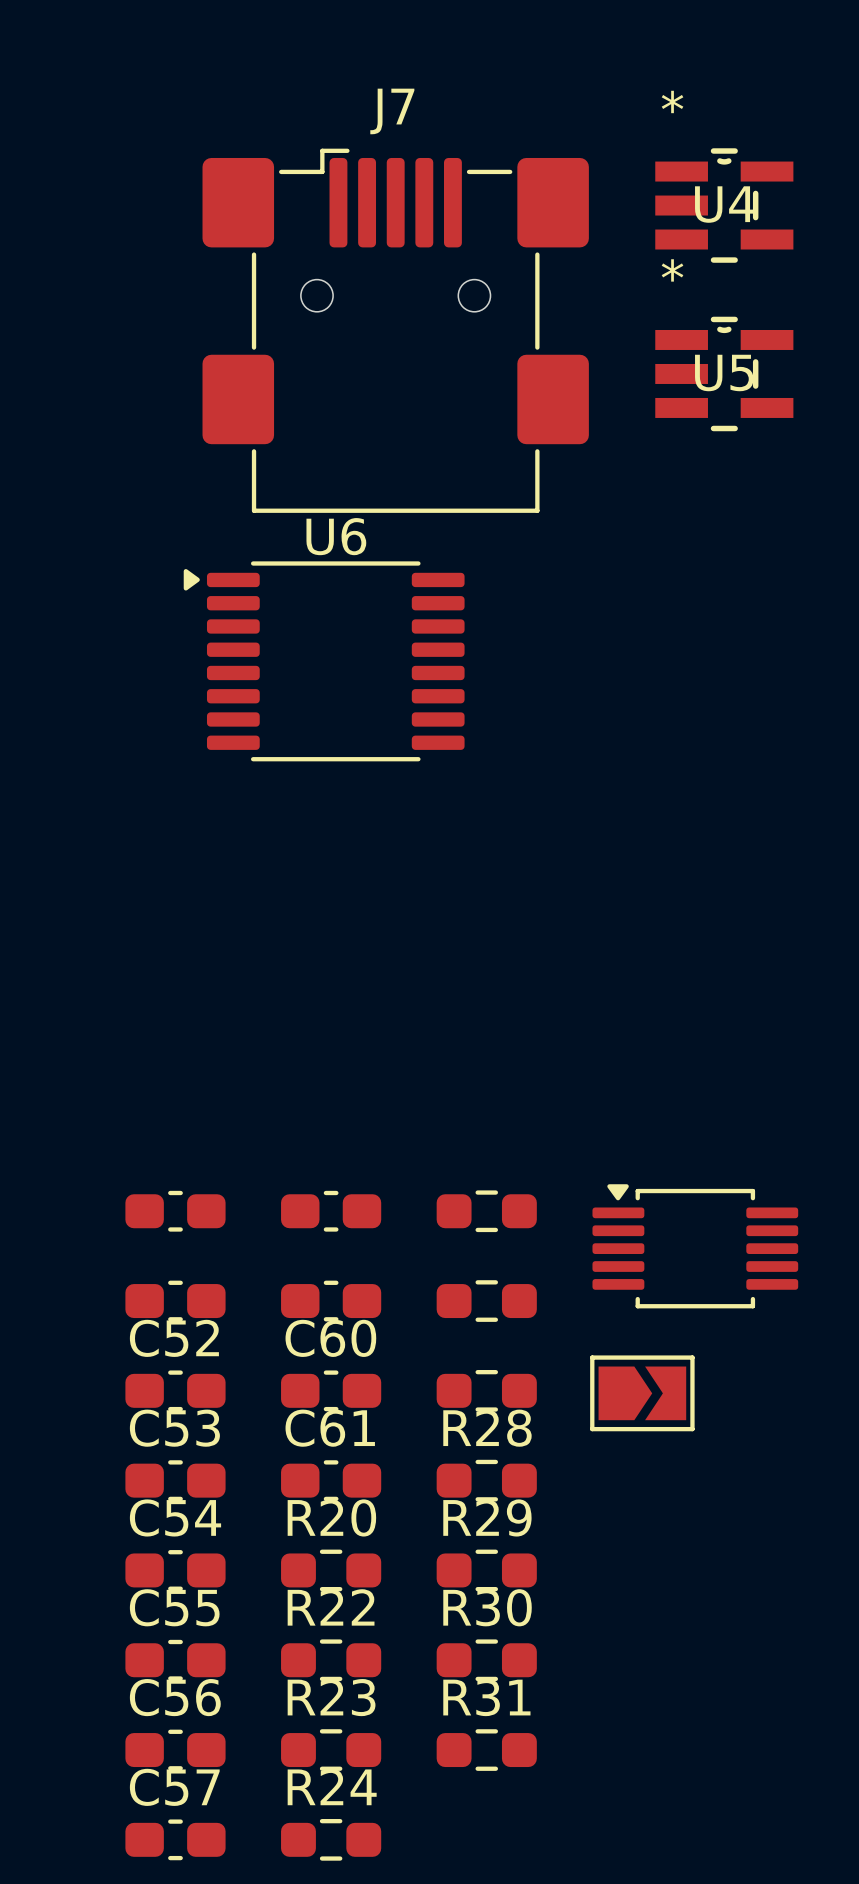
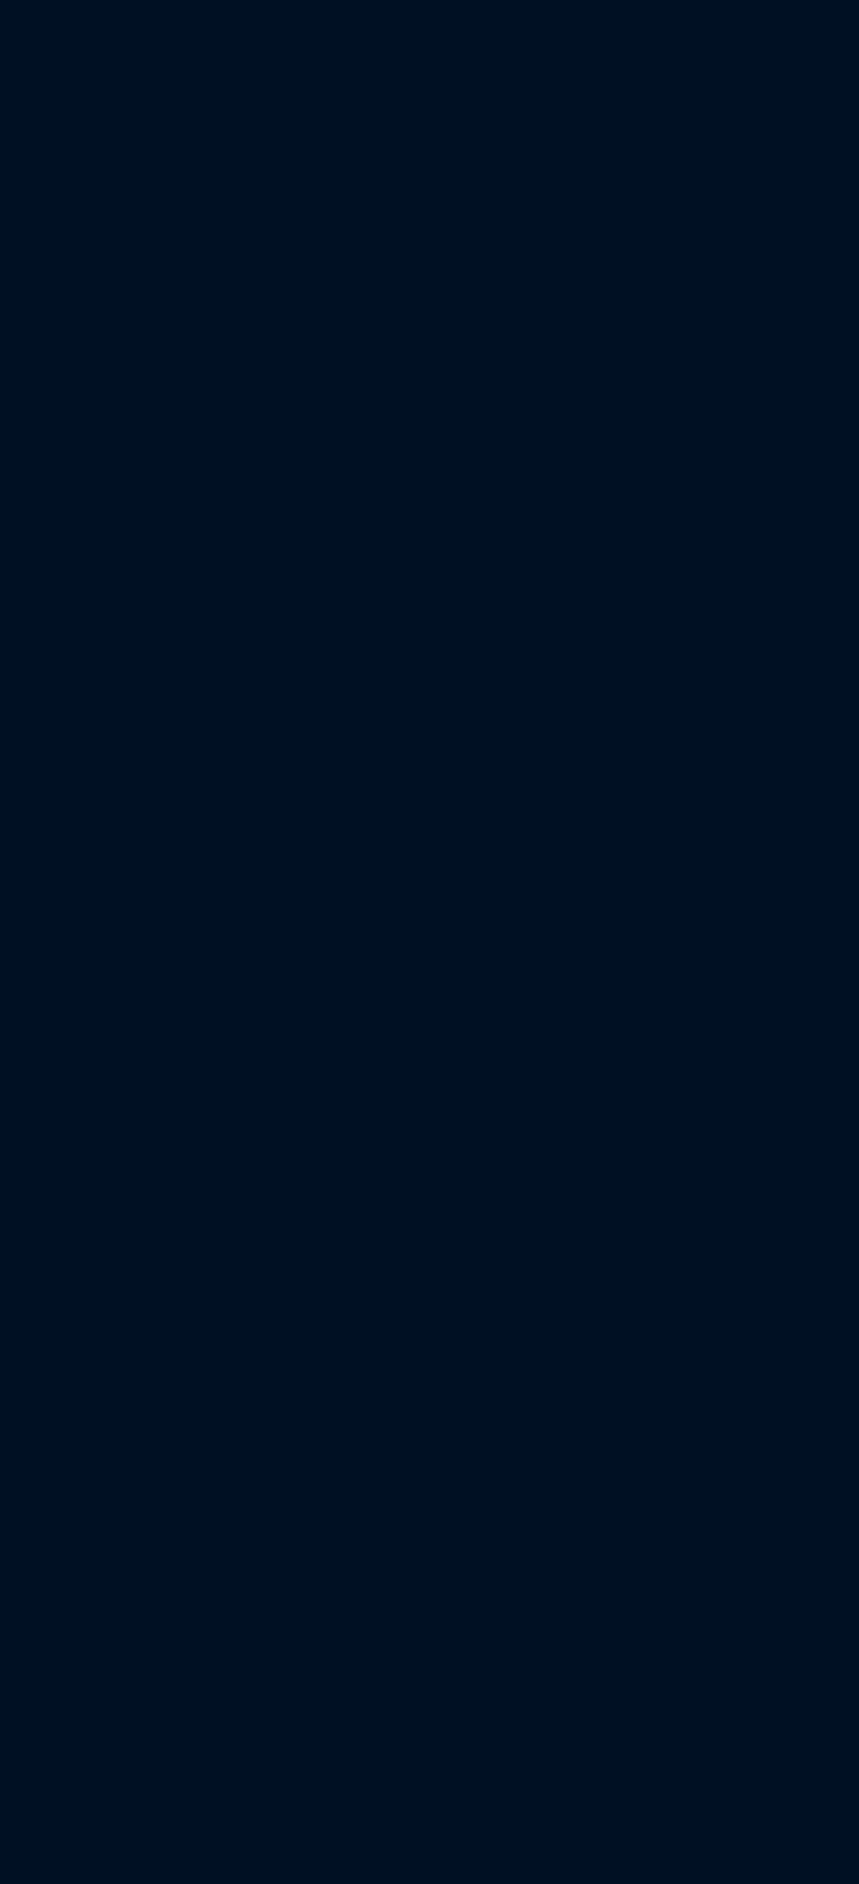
U4: (724, 205) -> none
J7: (395, 330) -> none
U5: (724, 373) -> none
U6: (324, 661) -> none
part: (175, 1211) -> none
part: (331, 1211) -> none
part: (486, 1211) -> none
part: (695, 1246) -> none
part: (175, 1301) -> none
part: (331, 1301) -> none
part: (486, 1301) -> none
C52: (175, 1390) -> none
C60: (331, 1390) -> none
part: (486, 1390) -> none
part: (642, 1393) -> none
C53: (175, 1480) -> none
C61: (331, 1480) -> none
R28: (486, 1480) -> none
C54: (175, 1570) -> none
R20: (331, 1570) -> none
R29: (486, 1570) -> none
C55: (175, 1660) -> none
R22: (331, 1660) -> none
R30: (486, 1660) -> none
C56: (175, 1750) -> none
R23: (331, 1750) -> none
R31: (486, 1750) -> none
C57: (175, 1839) -> none
R24: (331, 1839) -> none

